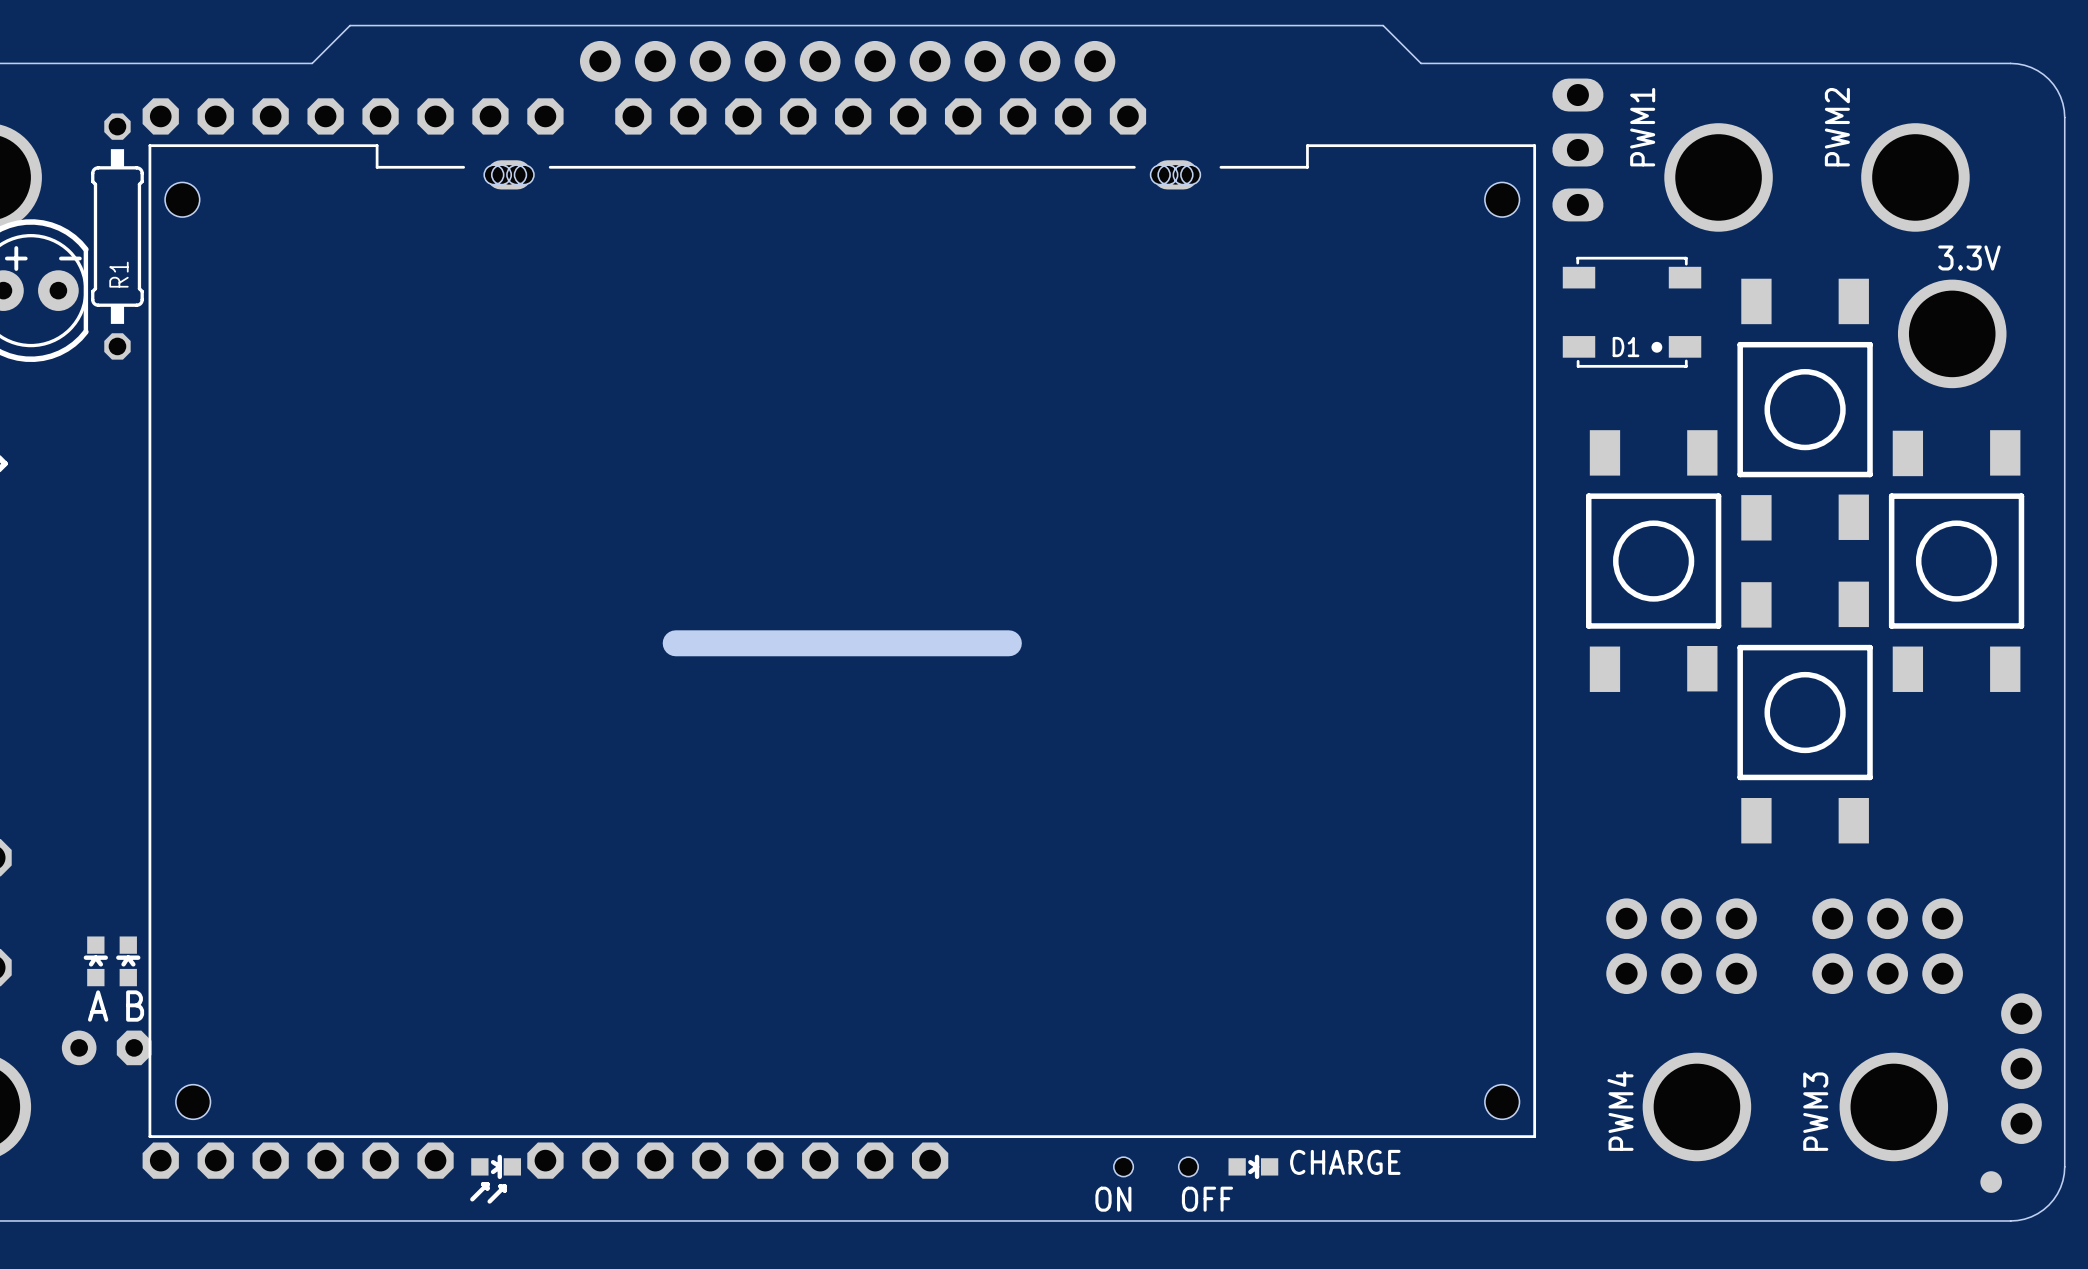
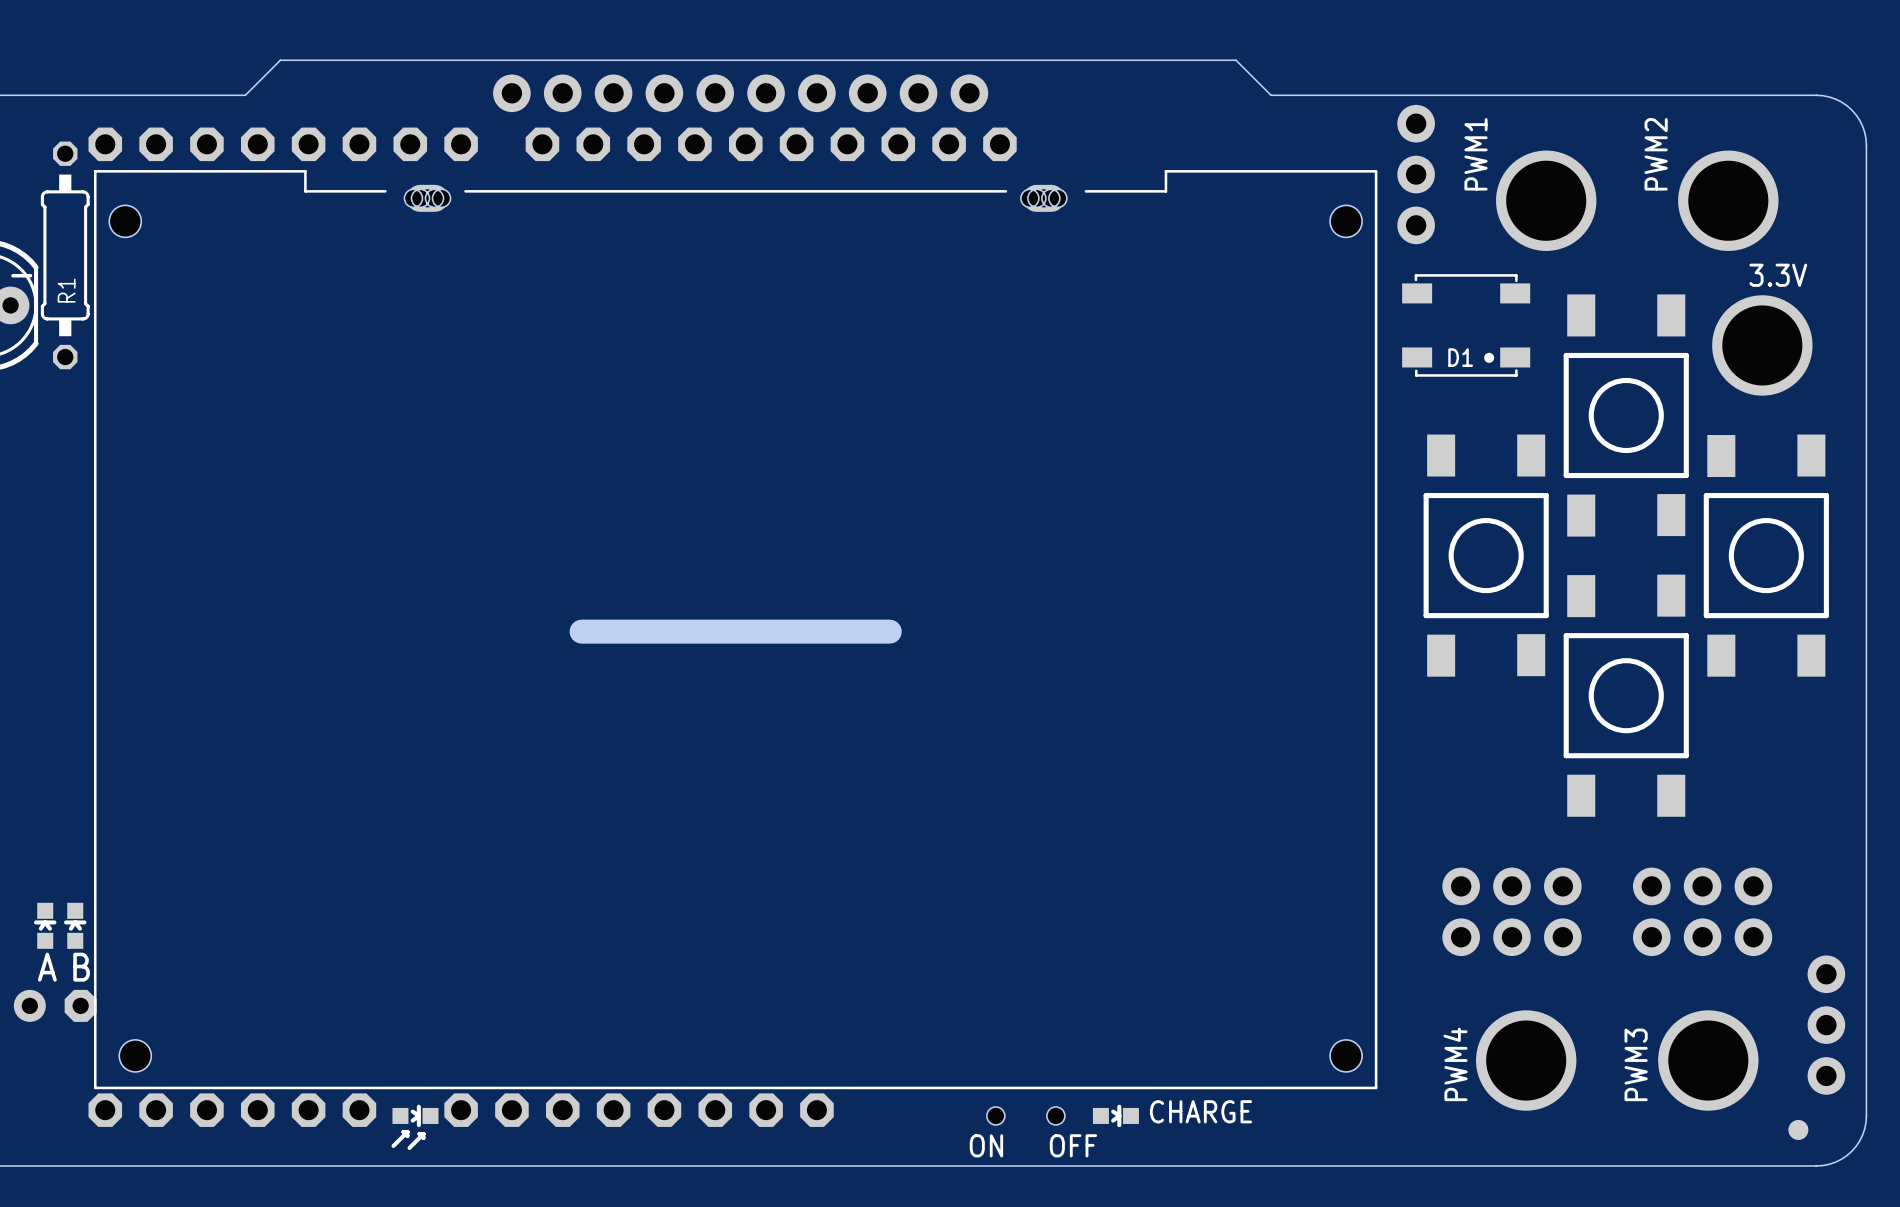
part footprint: [1552, 78, 1604, 222] -> [1397, 104, 1435, 245]

